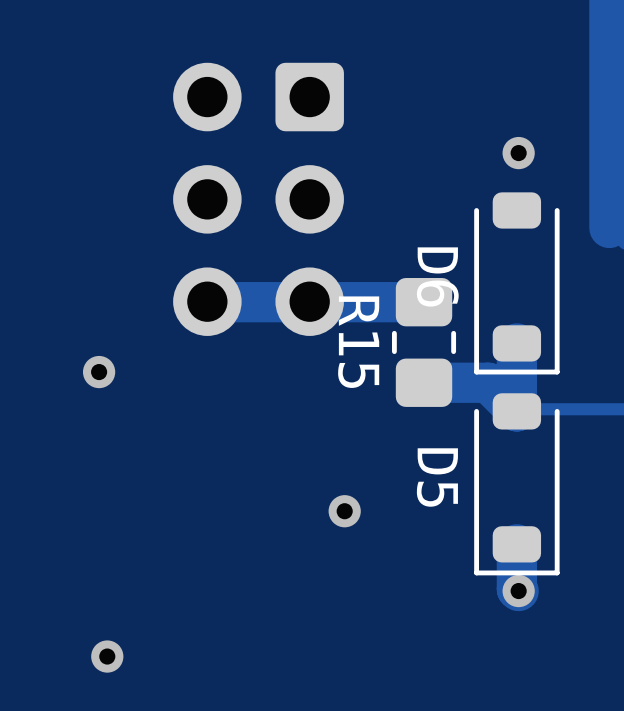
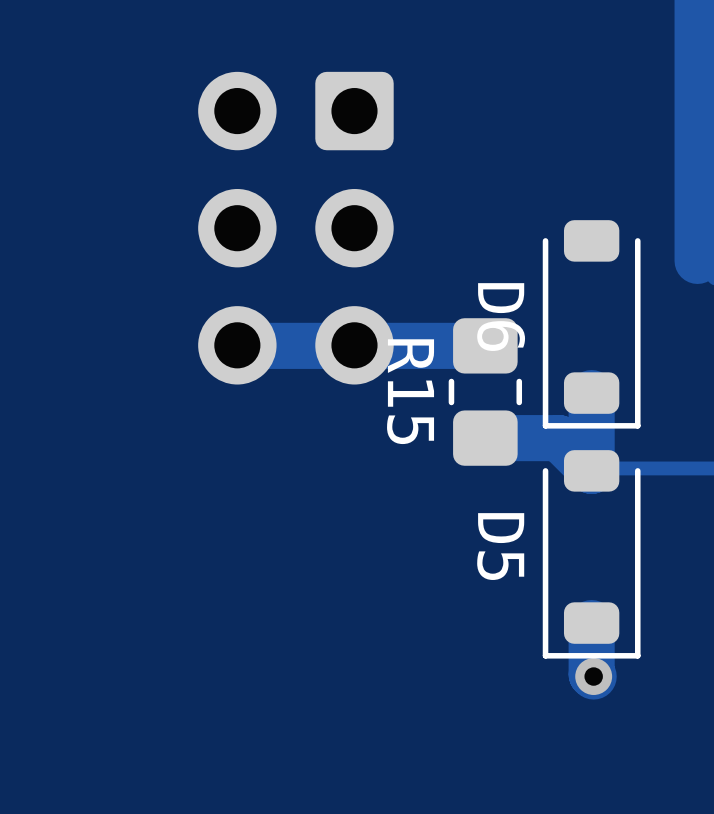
via: (518, 153) -> none
via: (99, 372) -> none
via: (344, 511) -> none
via: (107, 656) -> none

